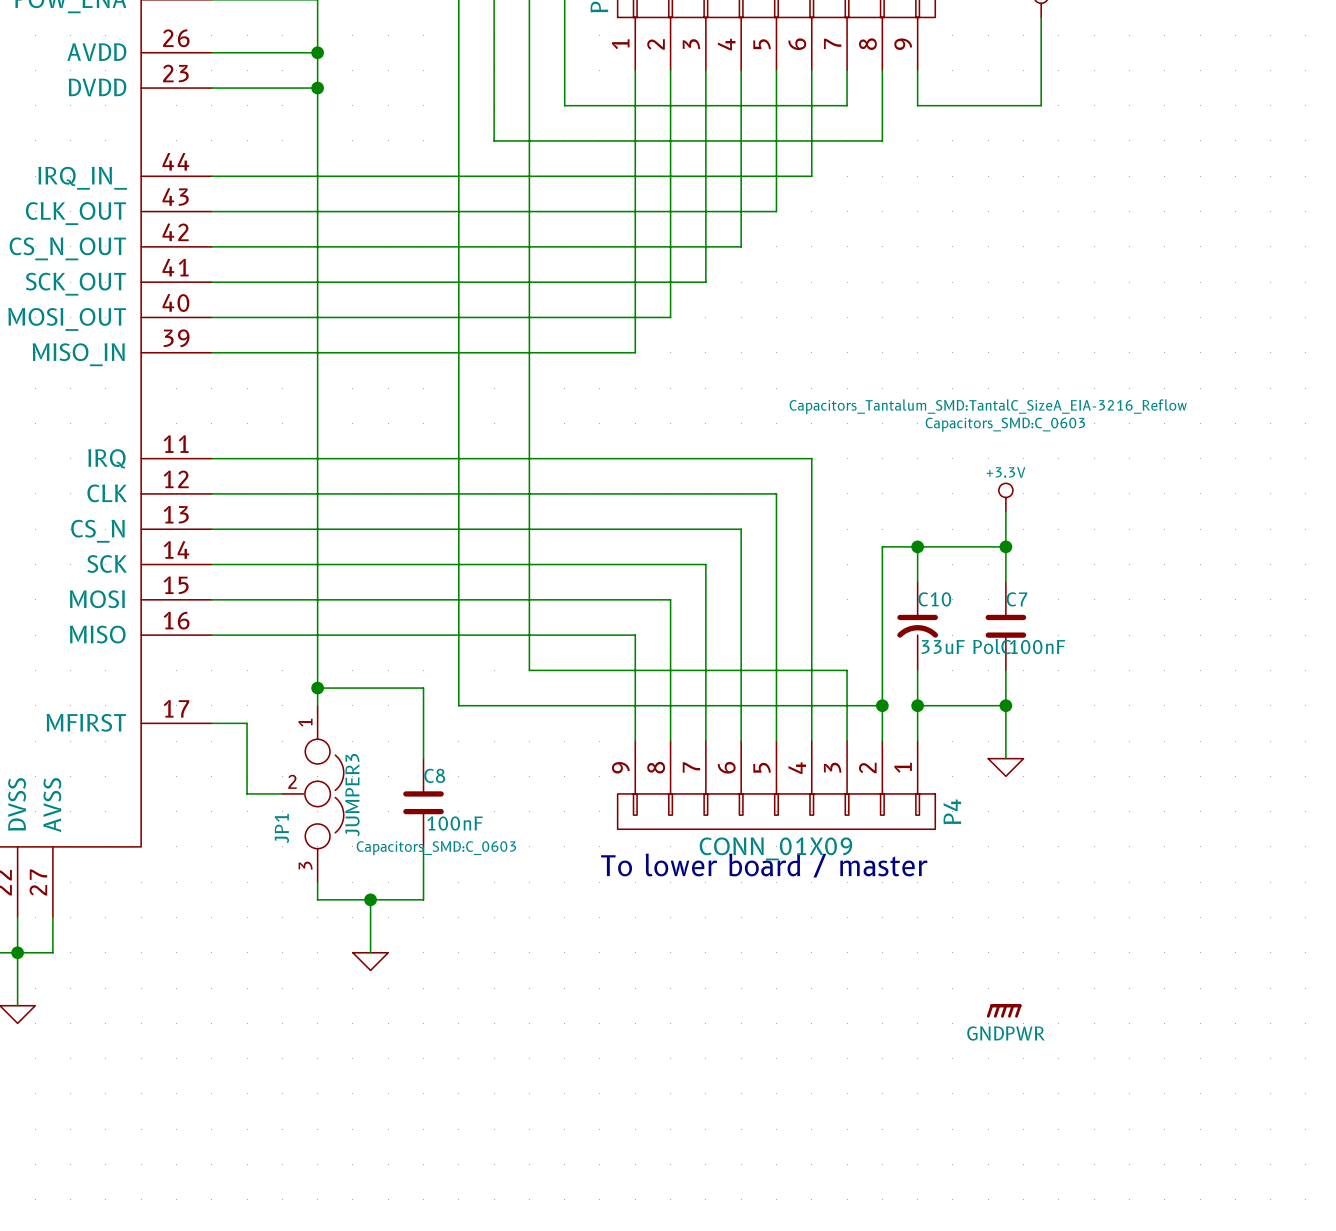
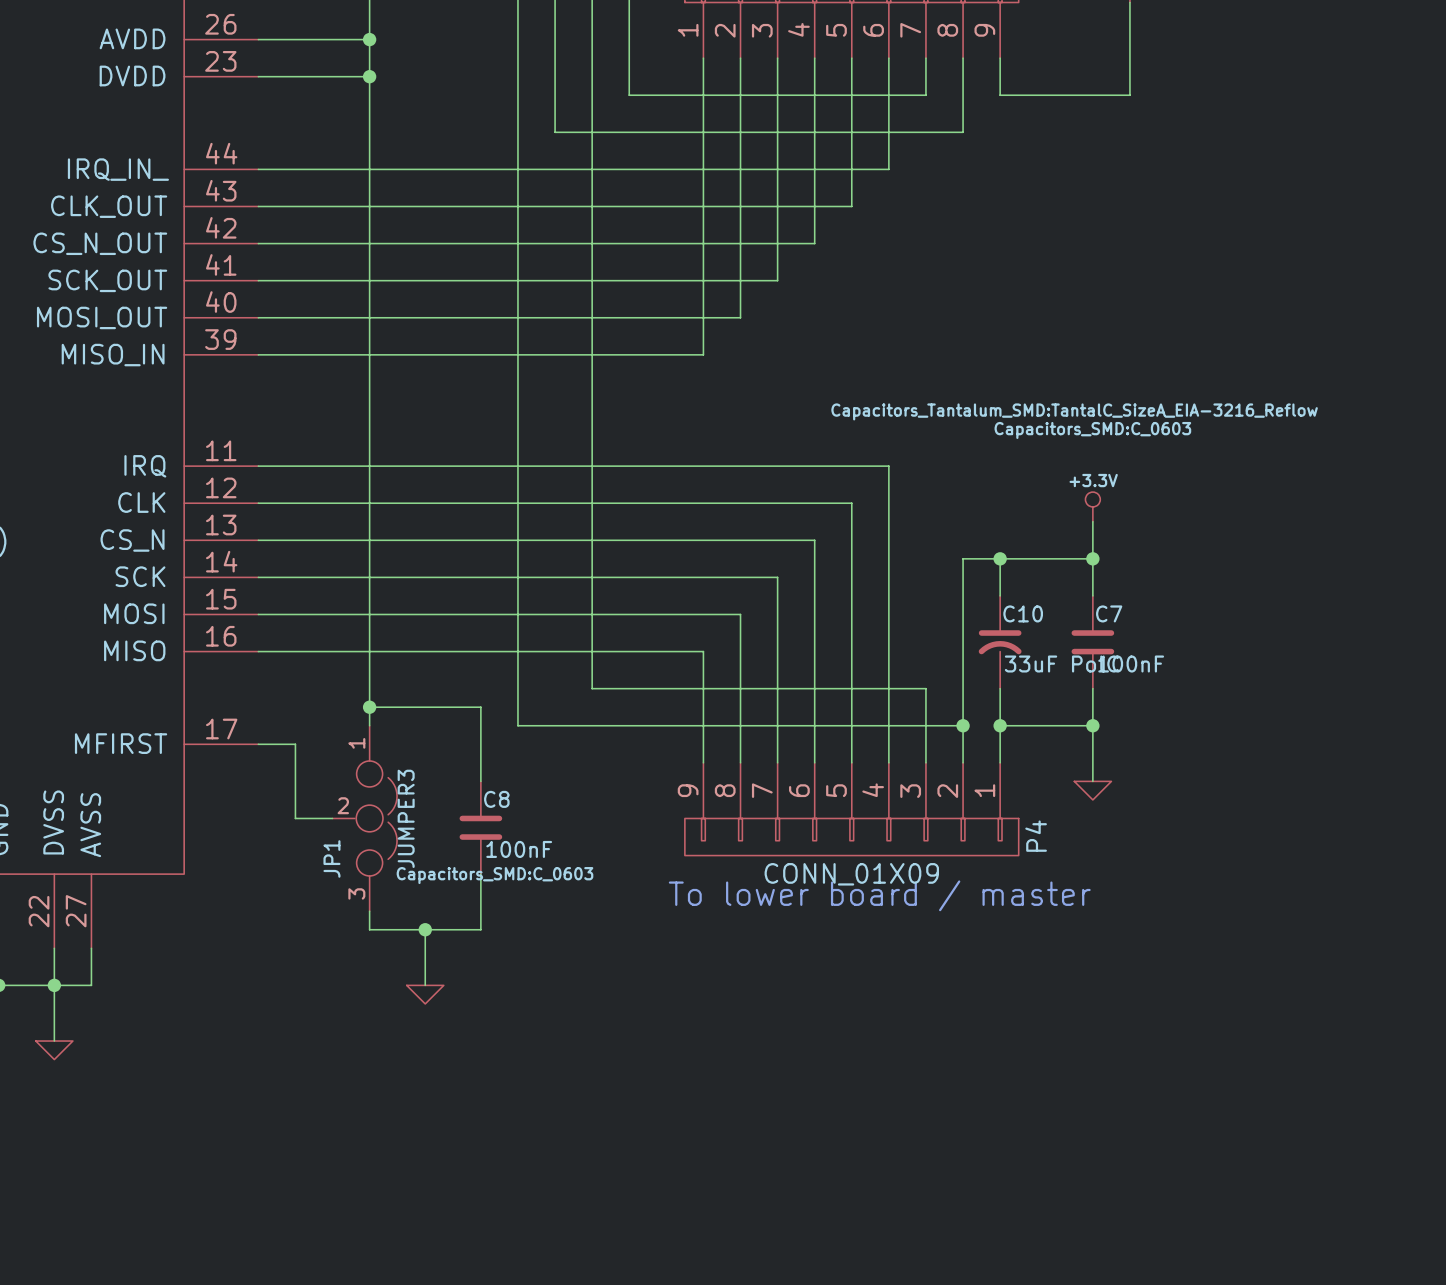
power symbol: GNDPWR (1004, 1010) -> none

